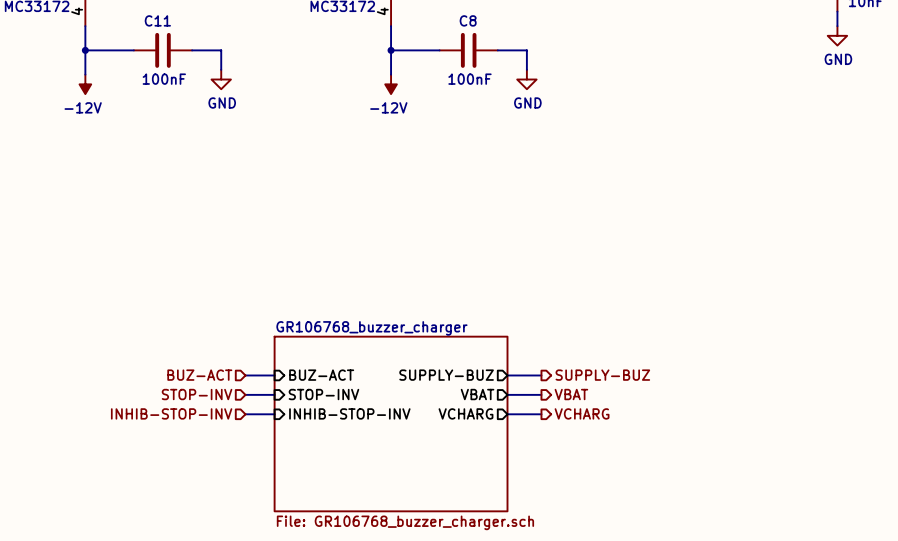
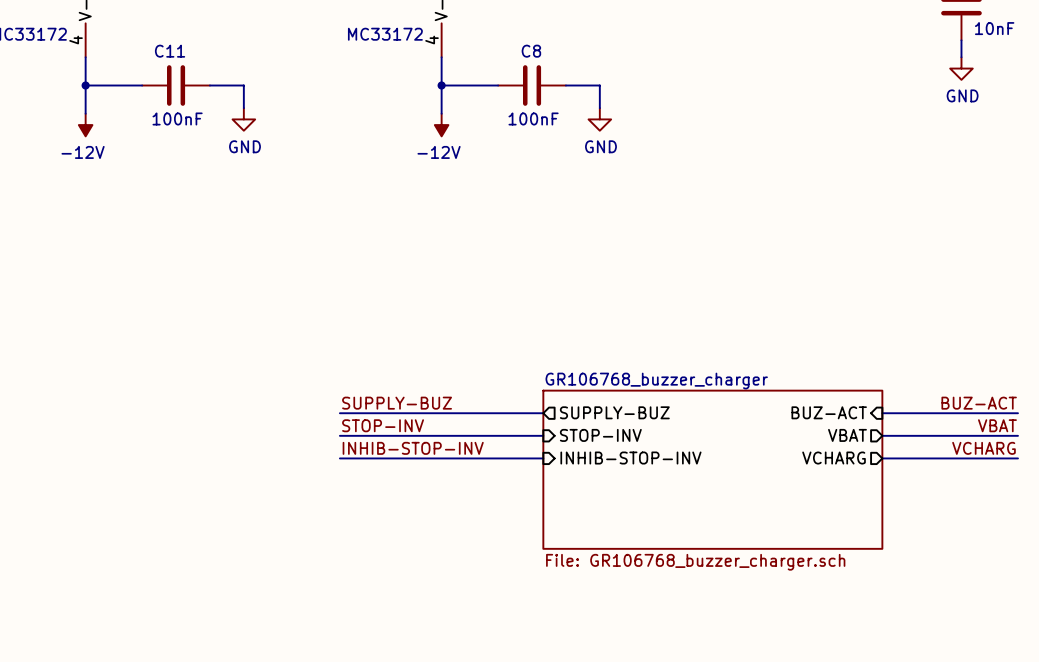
label: none -> SUPPLY-BUZ (397, 403)
label: none -> BUZ-ACT (979, 403)
sheet GR106768_buzzer_charger name position: GR106768_buzzer_charger (371, 328) -> GR106768_buzzer_charger (656, 381)
wire: none -> (339, 413) (543, 413)
sheet pin: none -> BUZ-ACT (829, 412)
wire: none -> (882, 413) (1017, 413)
sheet GR106768_buzzer_charger shape: [274, 336, 508, 512] -> [543, 390, 883, 549]
label: none -> STOP-INV (383, 425)
label: none -> VBAT (997, 425)
sheet pin: none -> STOP-INV (600, 435)
sheet pin: none -> VBAT (847, 435)
wire: none -> (339, 435) (543, 435)
wire: none -> (882, 435) (1017, 435)
label: none -> INHIB-STOP-INV (413, 448)
label: none -> VCHARG (983, 448)
wire: none -> (339, 458) (543, 458)
sheet pin: none -> INHIB-STOP-INV (630, 458)
sheet pin: none -> VCHARG (834, 458)
wire: none -> (882, 458) (1017, 458)
hierarchical label: BUZ-ACT (199, 375) -> none
wire: (245, 375) (274, 375) -> none
sheet pin: BUZ-ACT (321, 375) -> none
sheet pin rotation: 0° (446, 375) -> 180° (614, 412)
sheet pin position: SUPPLY-BUZ (446, 375) -> SUPPLY-BUZ (614, 412)
wire: (507, 375) (541, 375) -> none
hierarchical label: SUPPLY-BUZ (602, 375) -> none
hierarchical label: STOP-INV (197, 394) -> none
wire: (245, 394) (274, 394) -> none
sheet pin: STOP-INV (323, 394) -> none
sheet pin: VBAT (477, 394) -> none
wire: (507, 394) (541, 394) -> none
hierarchical label: VBAT (571, 394) -> none
hierarchical label: INHIB-STOP-INV (171, 413) -> none
sheet pin: INHIB-STOP-INV (349, 413) -> none
sheet pin: VCHARG (465, 413) -> none
hierarchical label: VCHARG (582, 413) -> none
wire: (245, 414) (274, 414) -> none
wire: (507, 414) (541, 414) -> none
sheet GR106768_buzzer_charger value position: File: GR106768_buzzer_charger.sch (405, 522) -> File: GR106768_buzzer_charger.sch (695, 562)

